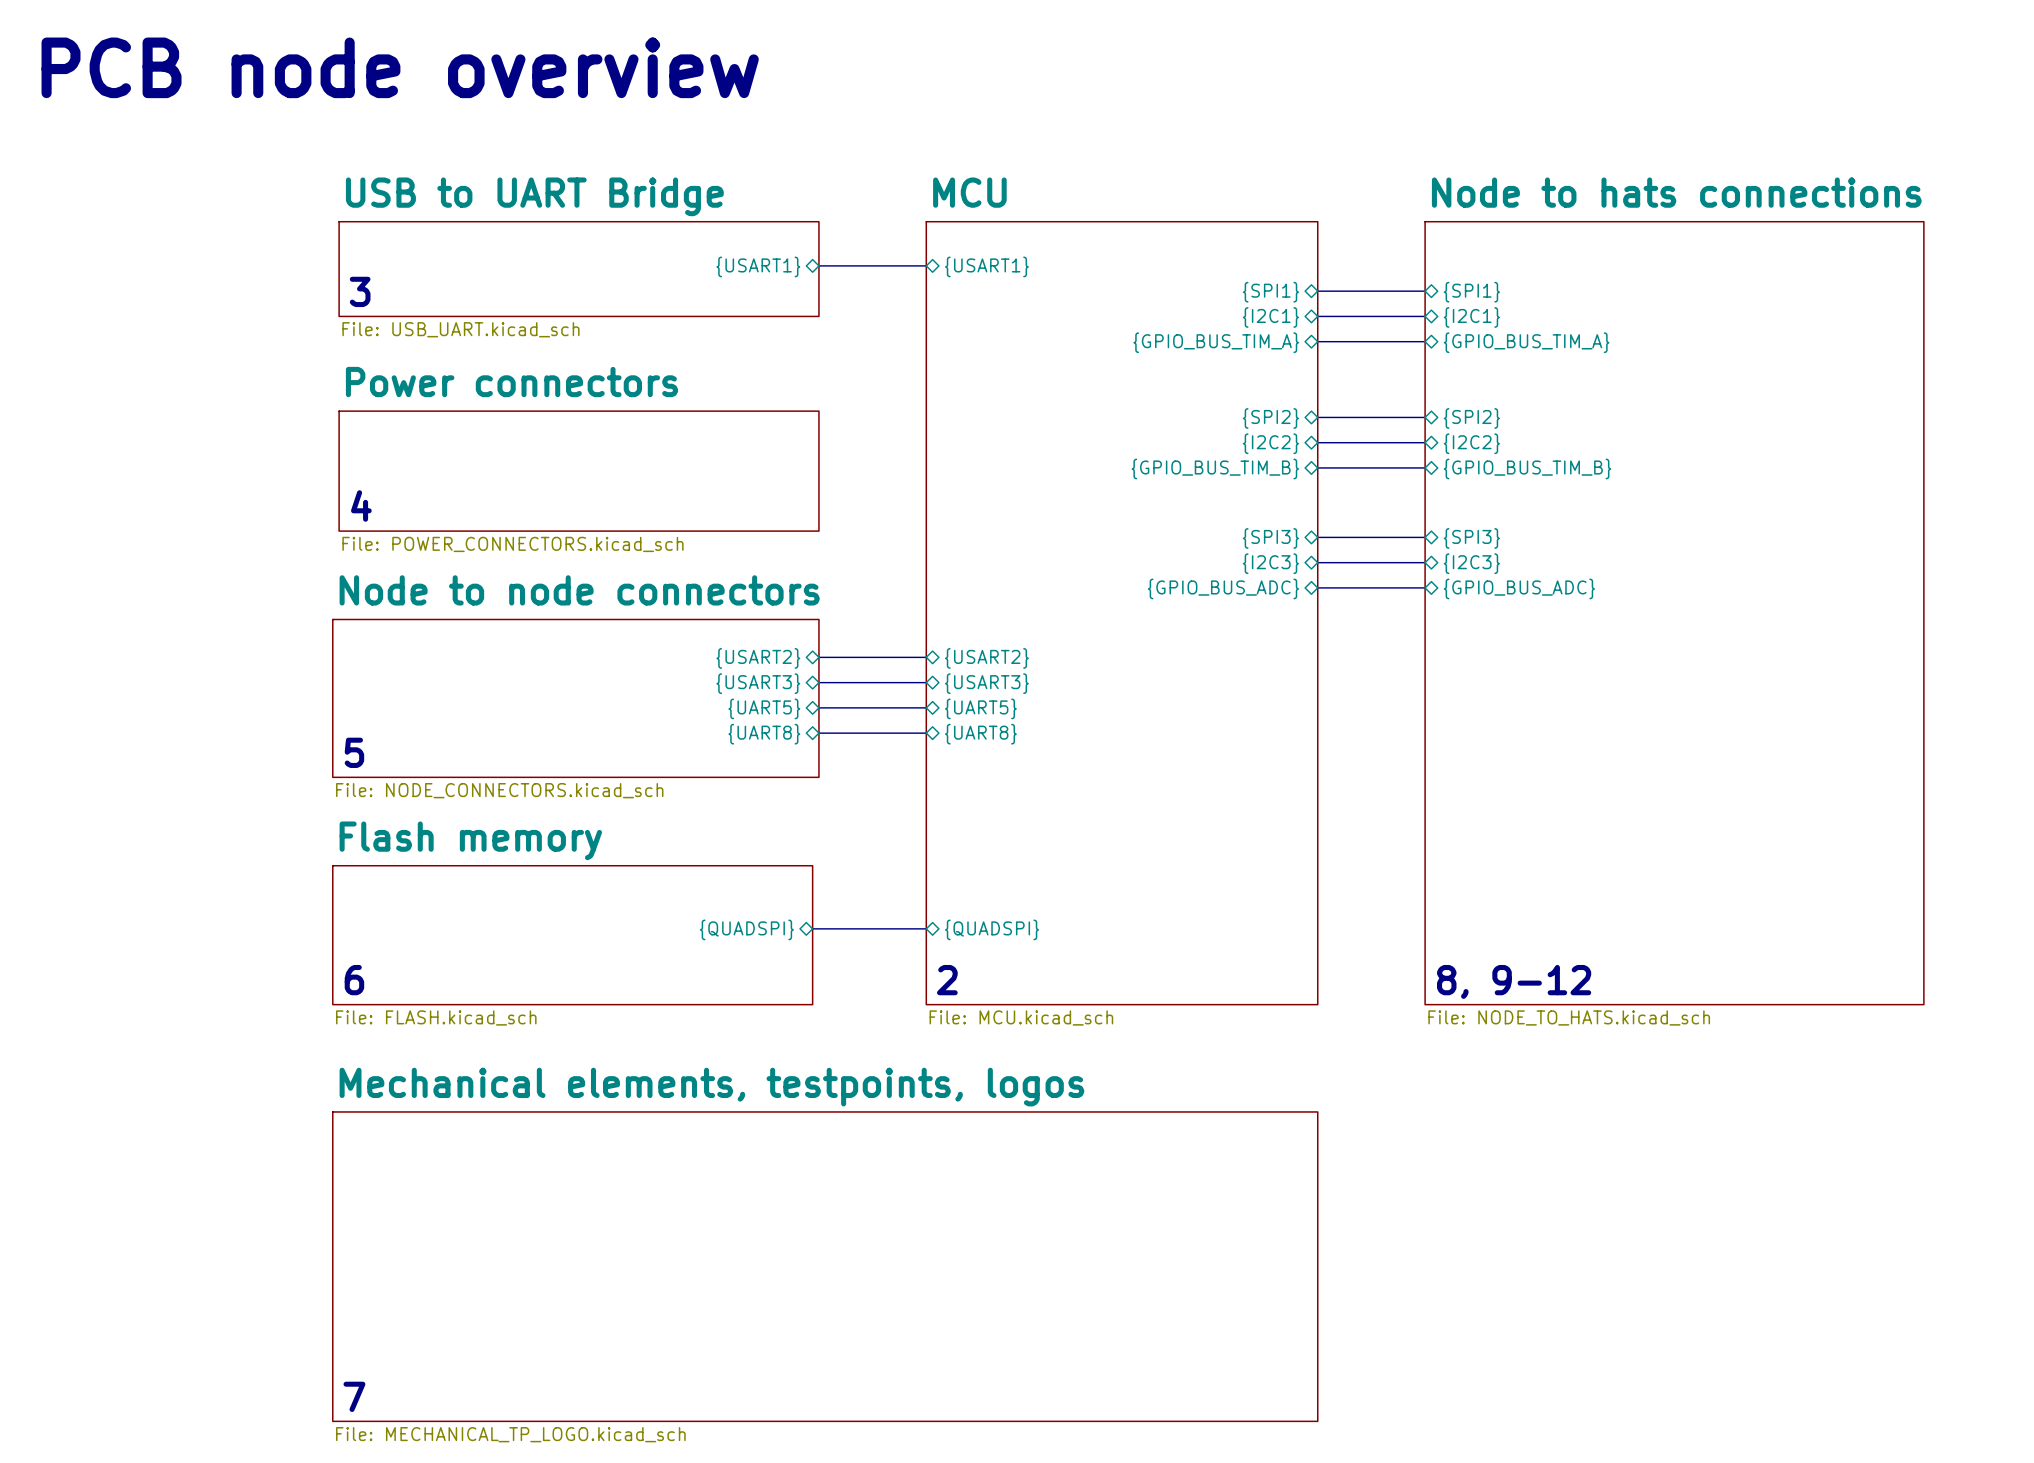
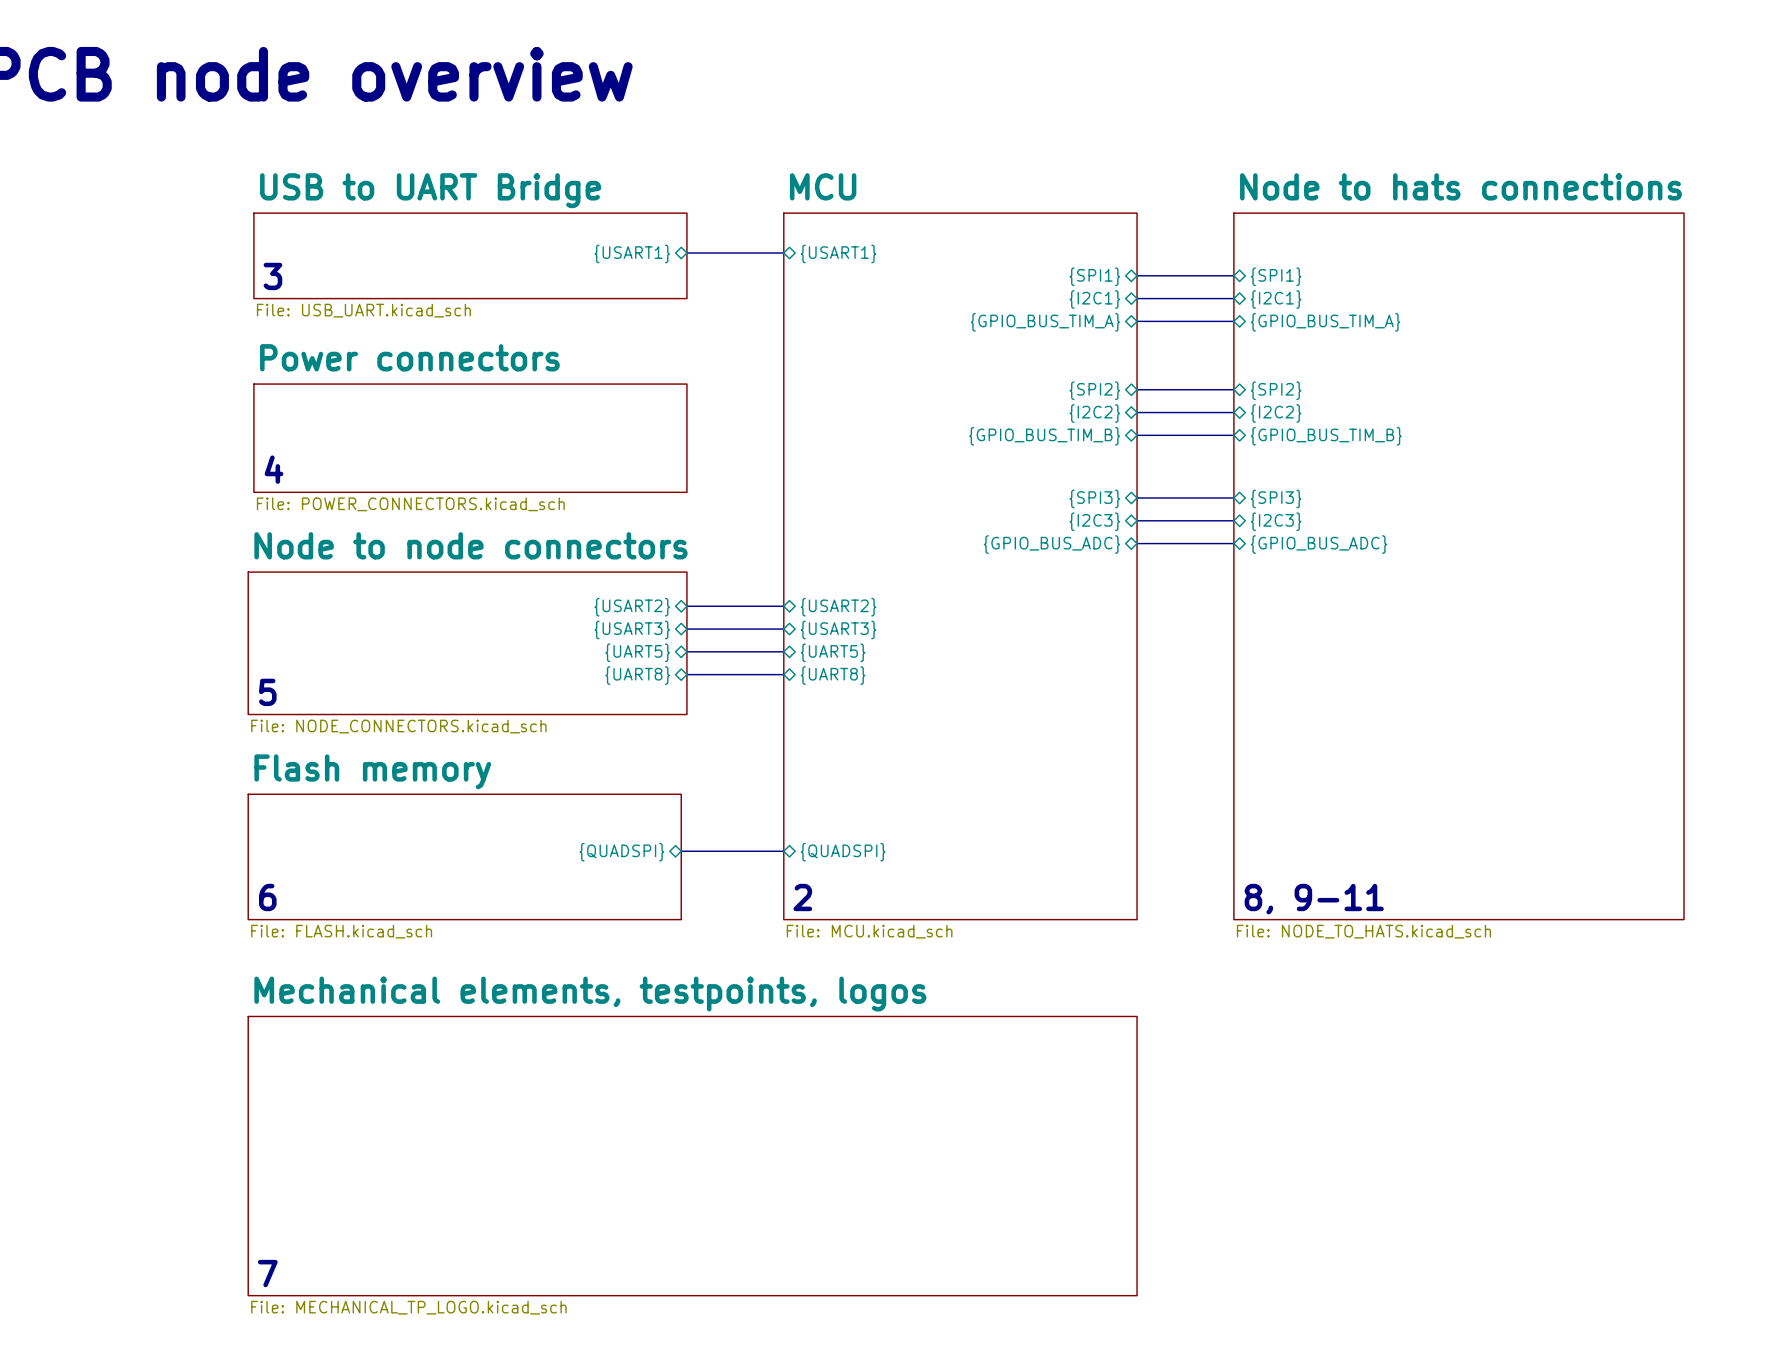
text: 8, 9-12 (1514, 981) -> 8, 9-11 (1314, 899)

